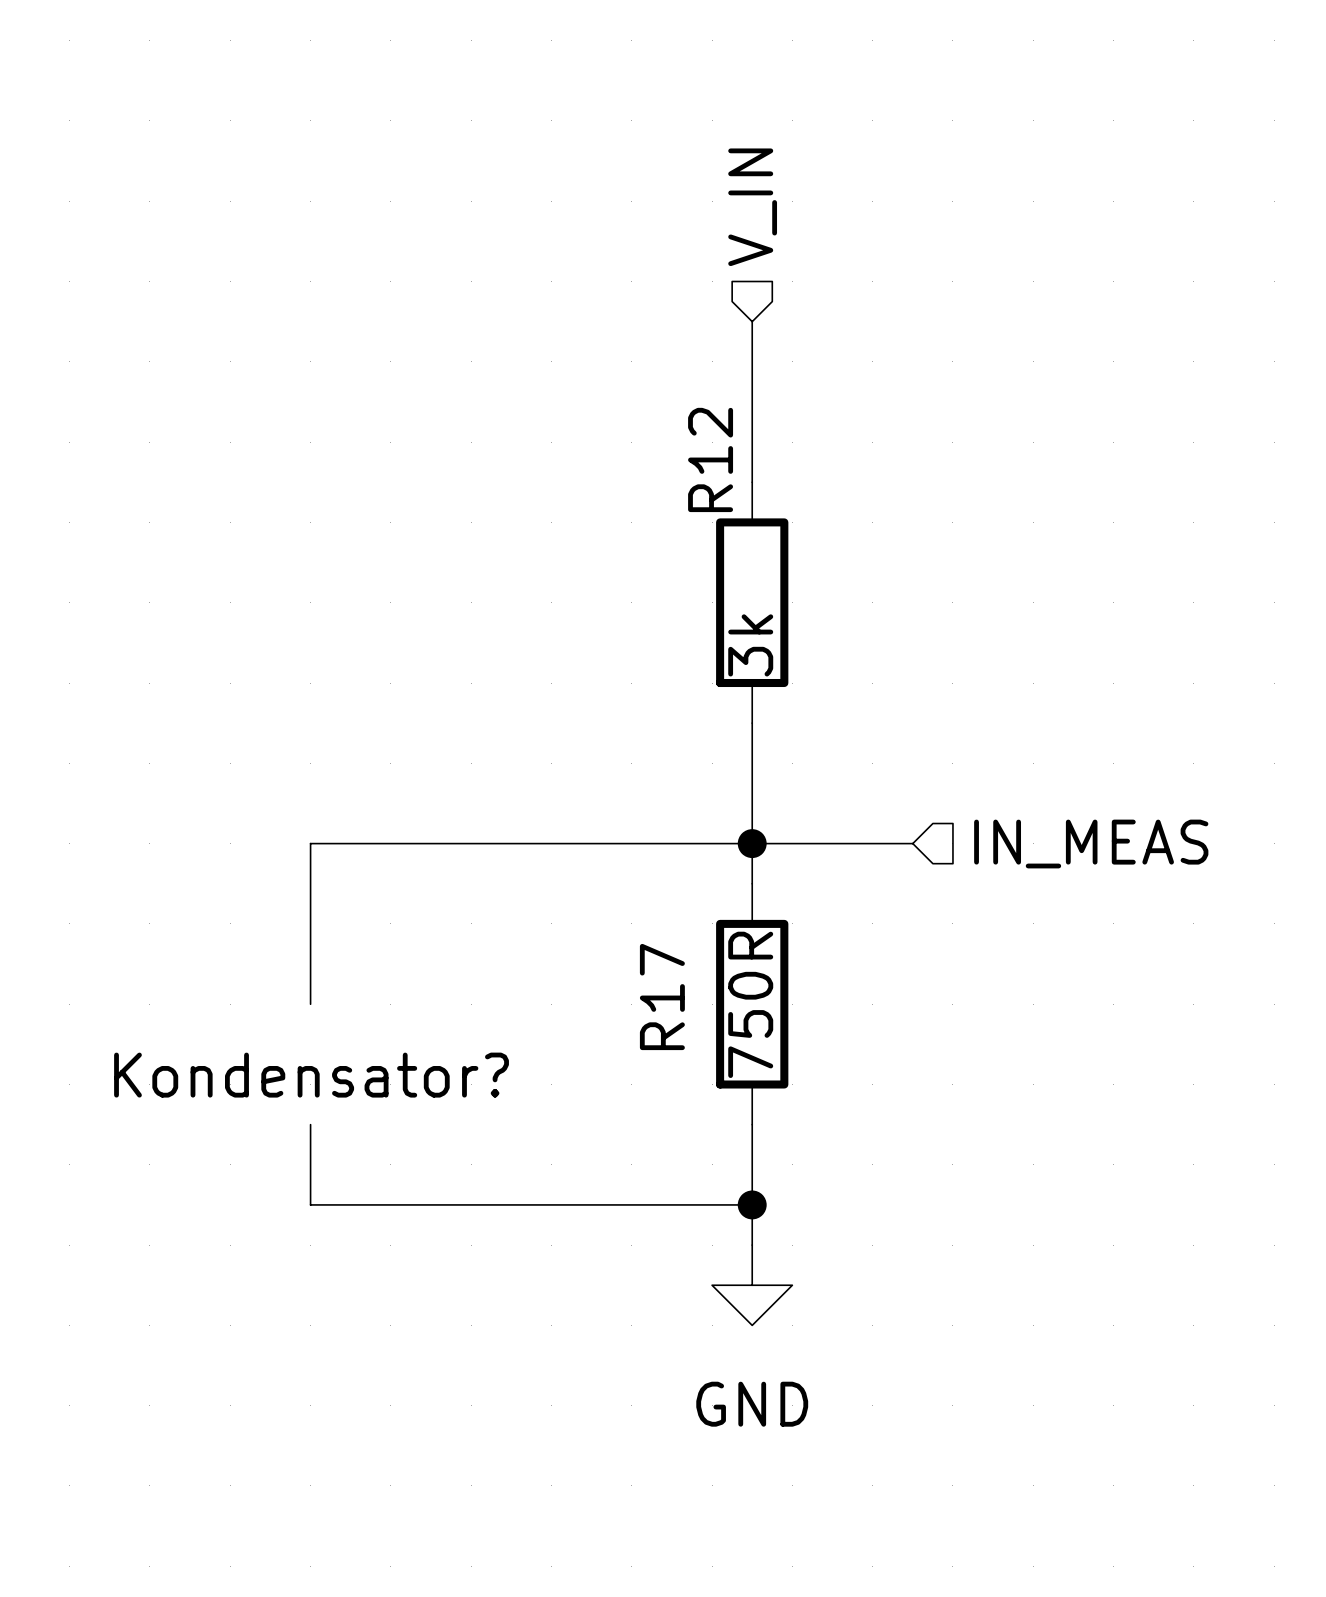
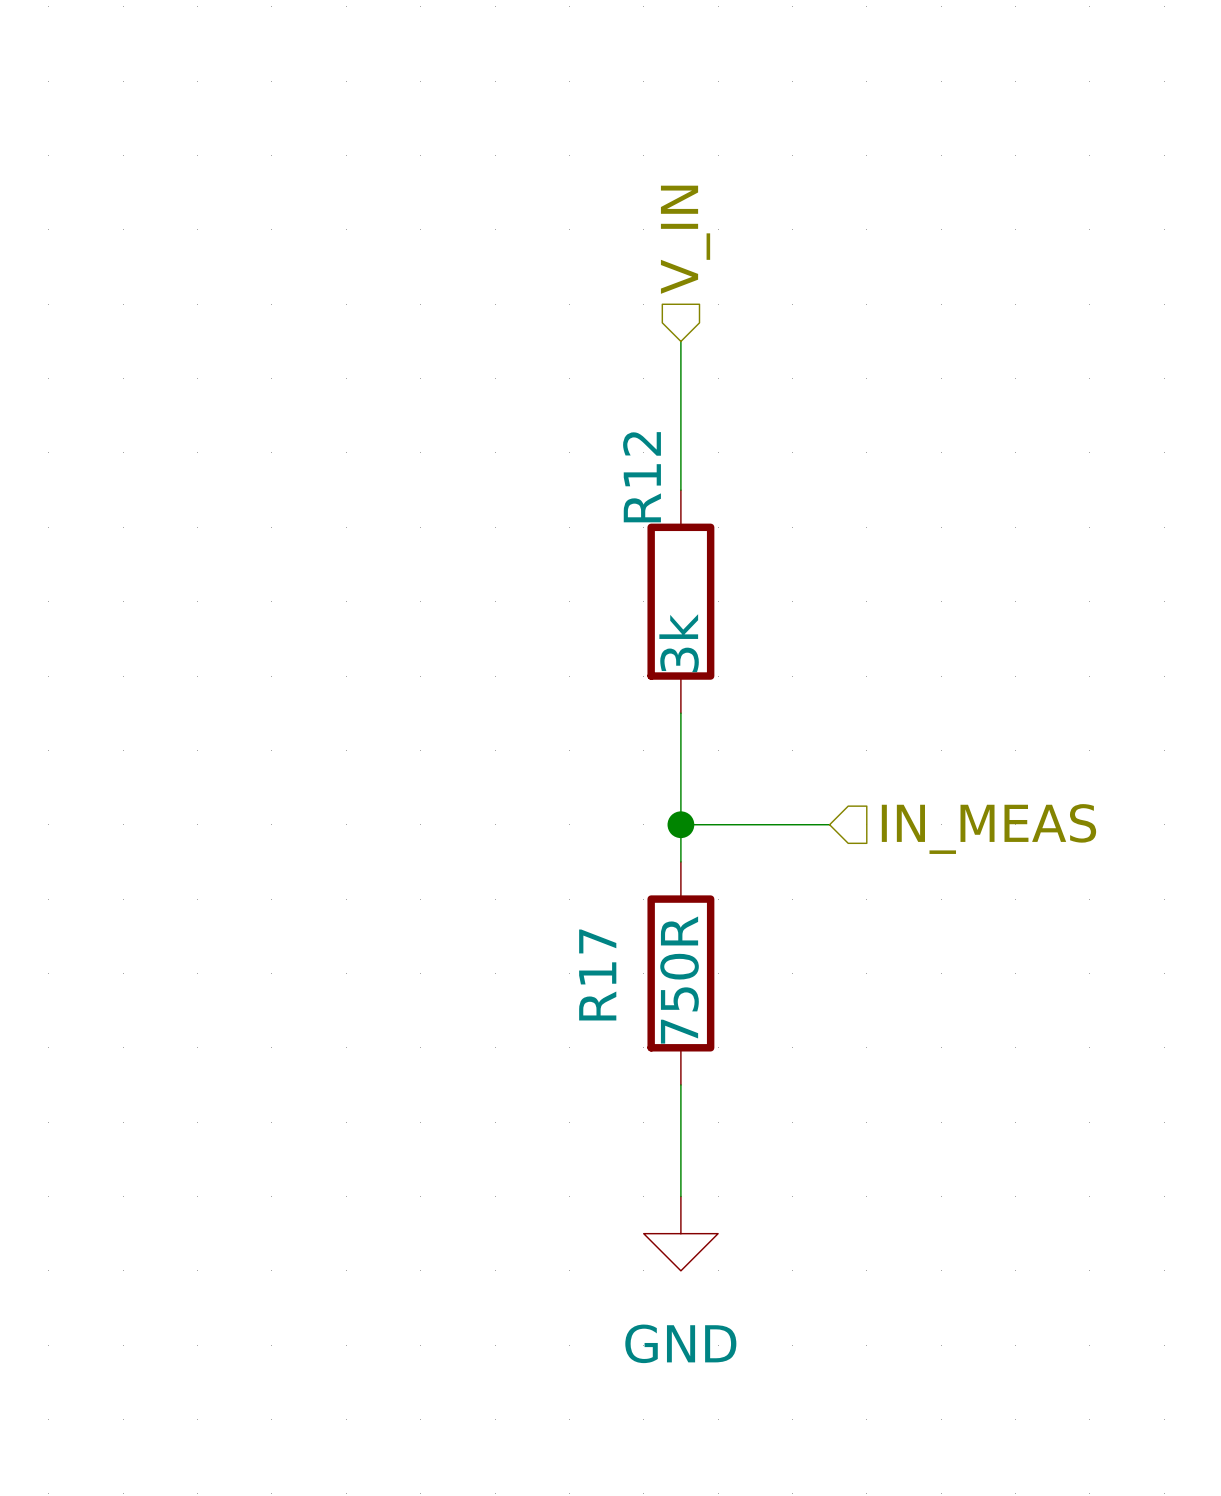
wire: (752, 843) (310, 843) (310, 1004) -> none
text: Kondensator? (311, 1075) -> none
wire: (310, 1124) (310, 1204) (752, 1204) -> none
junction: (752, 1204) -> none

